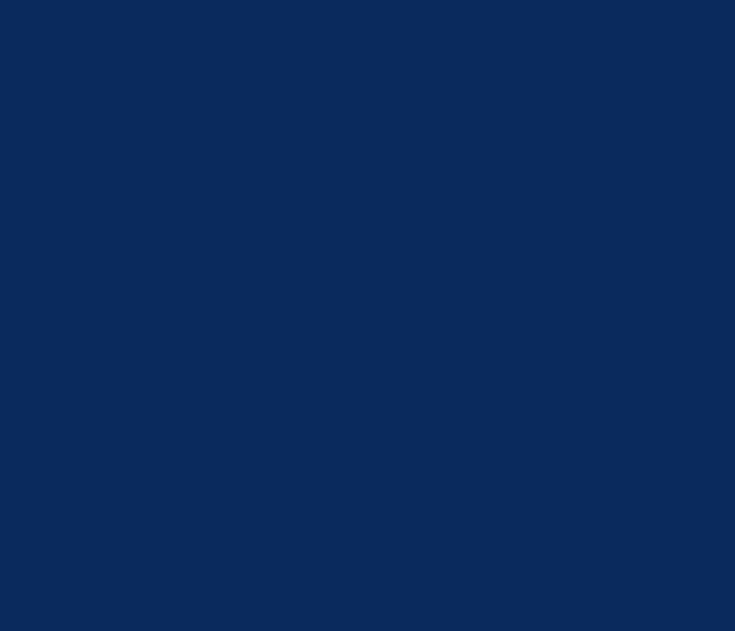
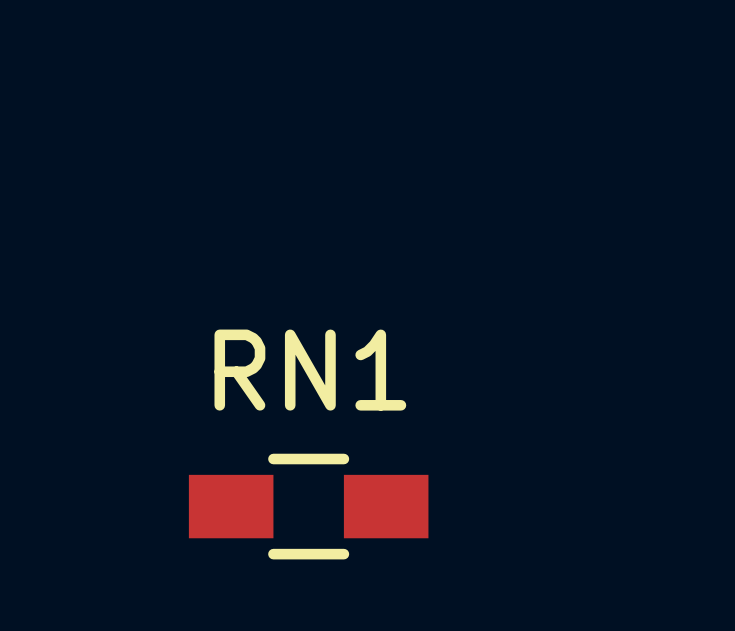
RN1: none -> (308, 506)

